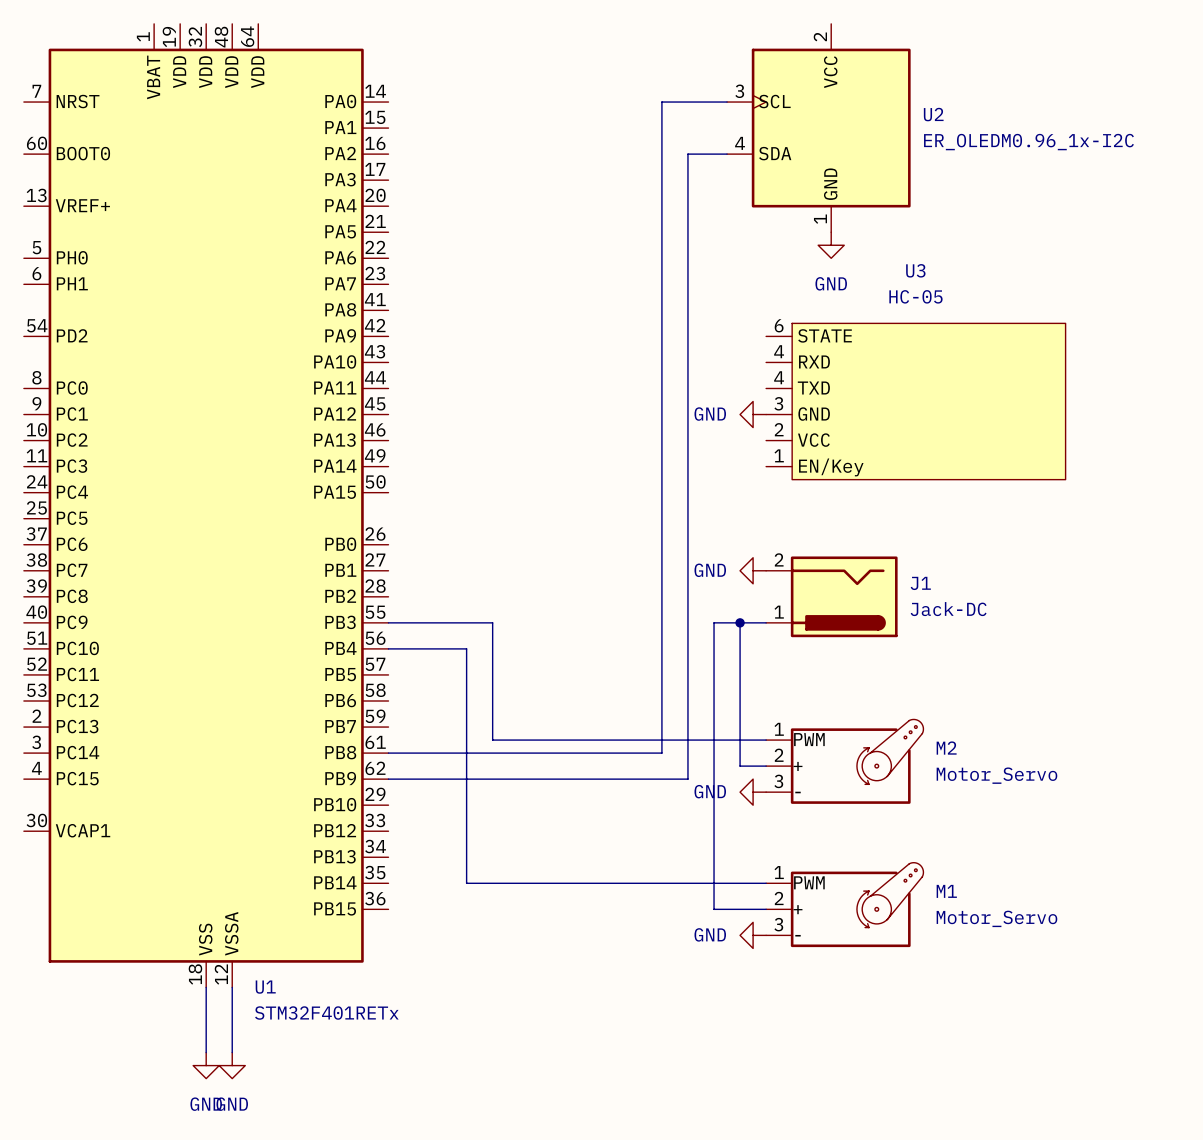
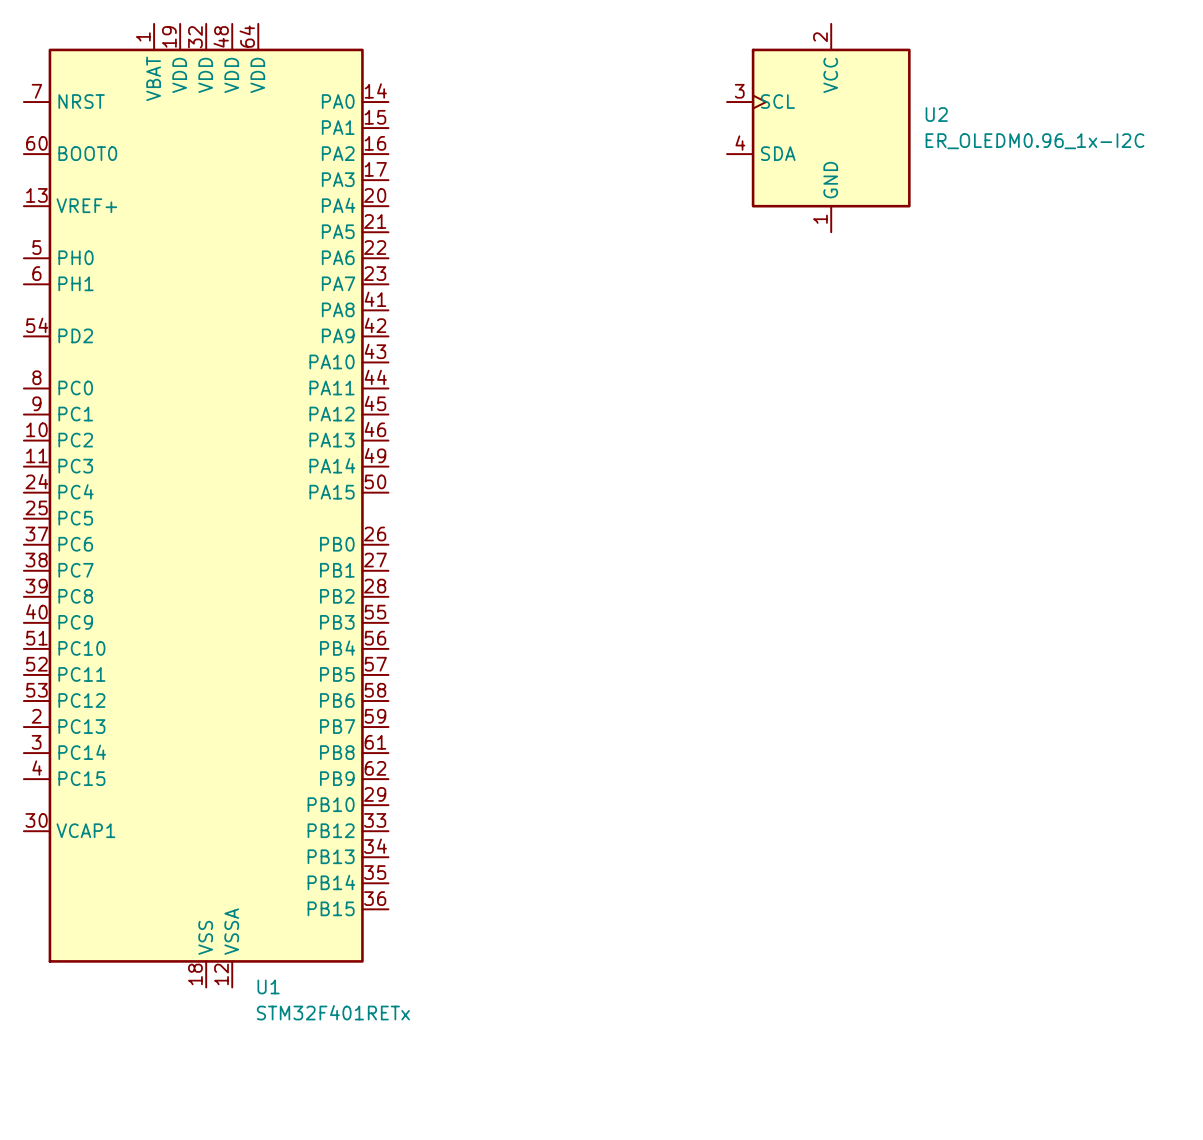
wire: (727, 102) (661, 102) (661, 753) (388, 753) -> none
wire: (727, 154) (687, 154) (687, 779) (388, 779) -> none
power symbol: GND (831, 245) -> none
U3: HC-05 (915, 401) -> none
power symbol: GND (753, 414) -> none
power symbol: GND (753, 570) -> none
J1: Jack-DC (831, 596) -> none
wire: (388, 622) (492, 622) (492, 740) (766, 740) -> none
wire: (740, 622) (740, 766) (766, 766) -> none
junction: (740, 622) -> none
wire: (766, 622) (714, 622) (714, 909) (766, 909) -> none
wire: (388, 648) (466, 648) (466, 883) (766, 883) -> none
M2: Motor_Servo (844, 761) -> none
power symbol: GND (753, 792) -> none
M1: Motor_Servo (844, 904) -> none
power symbol: GND (753, 935) -> none
wire: (206, 987) (206, 1052) -> none
wire: (232, 987) (232, 1052) -> none
power symbol: GND (206, 1065) -> none
power symbol: GND (232, 1065) -> none

